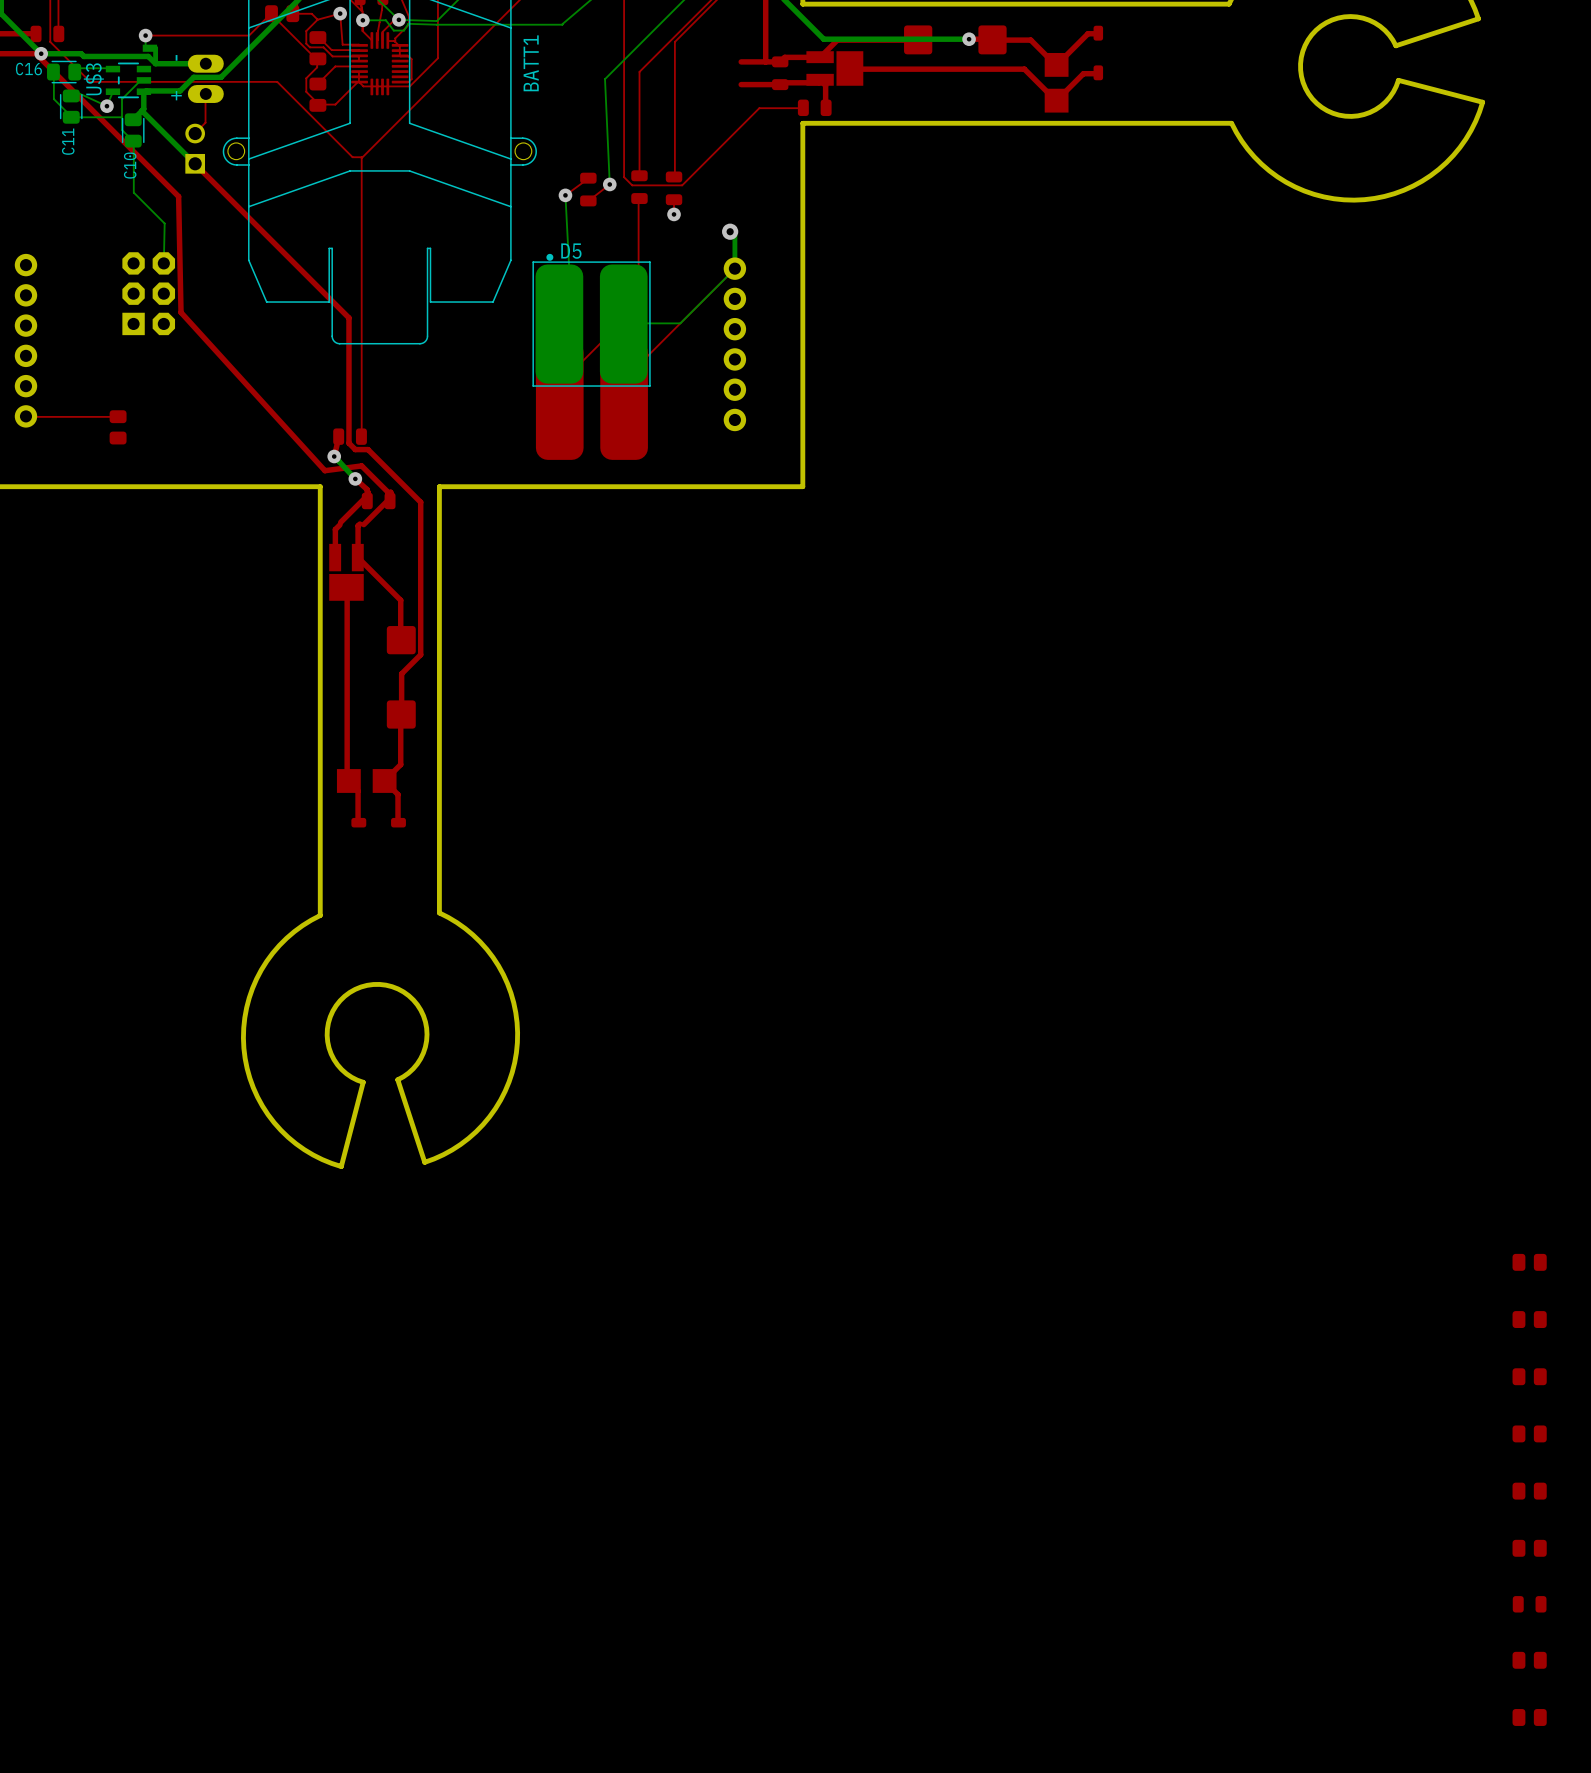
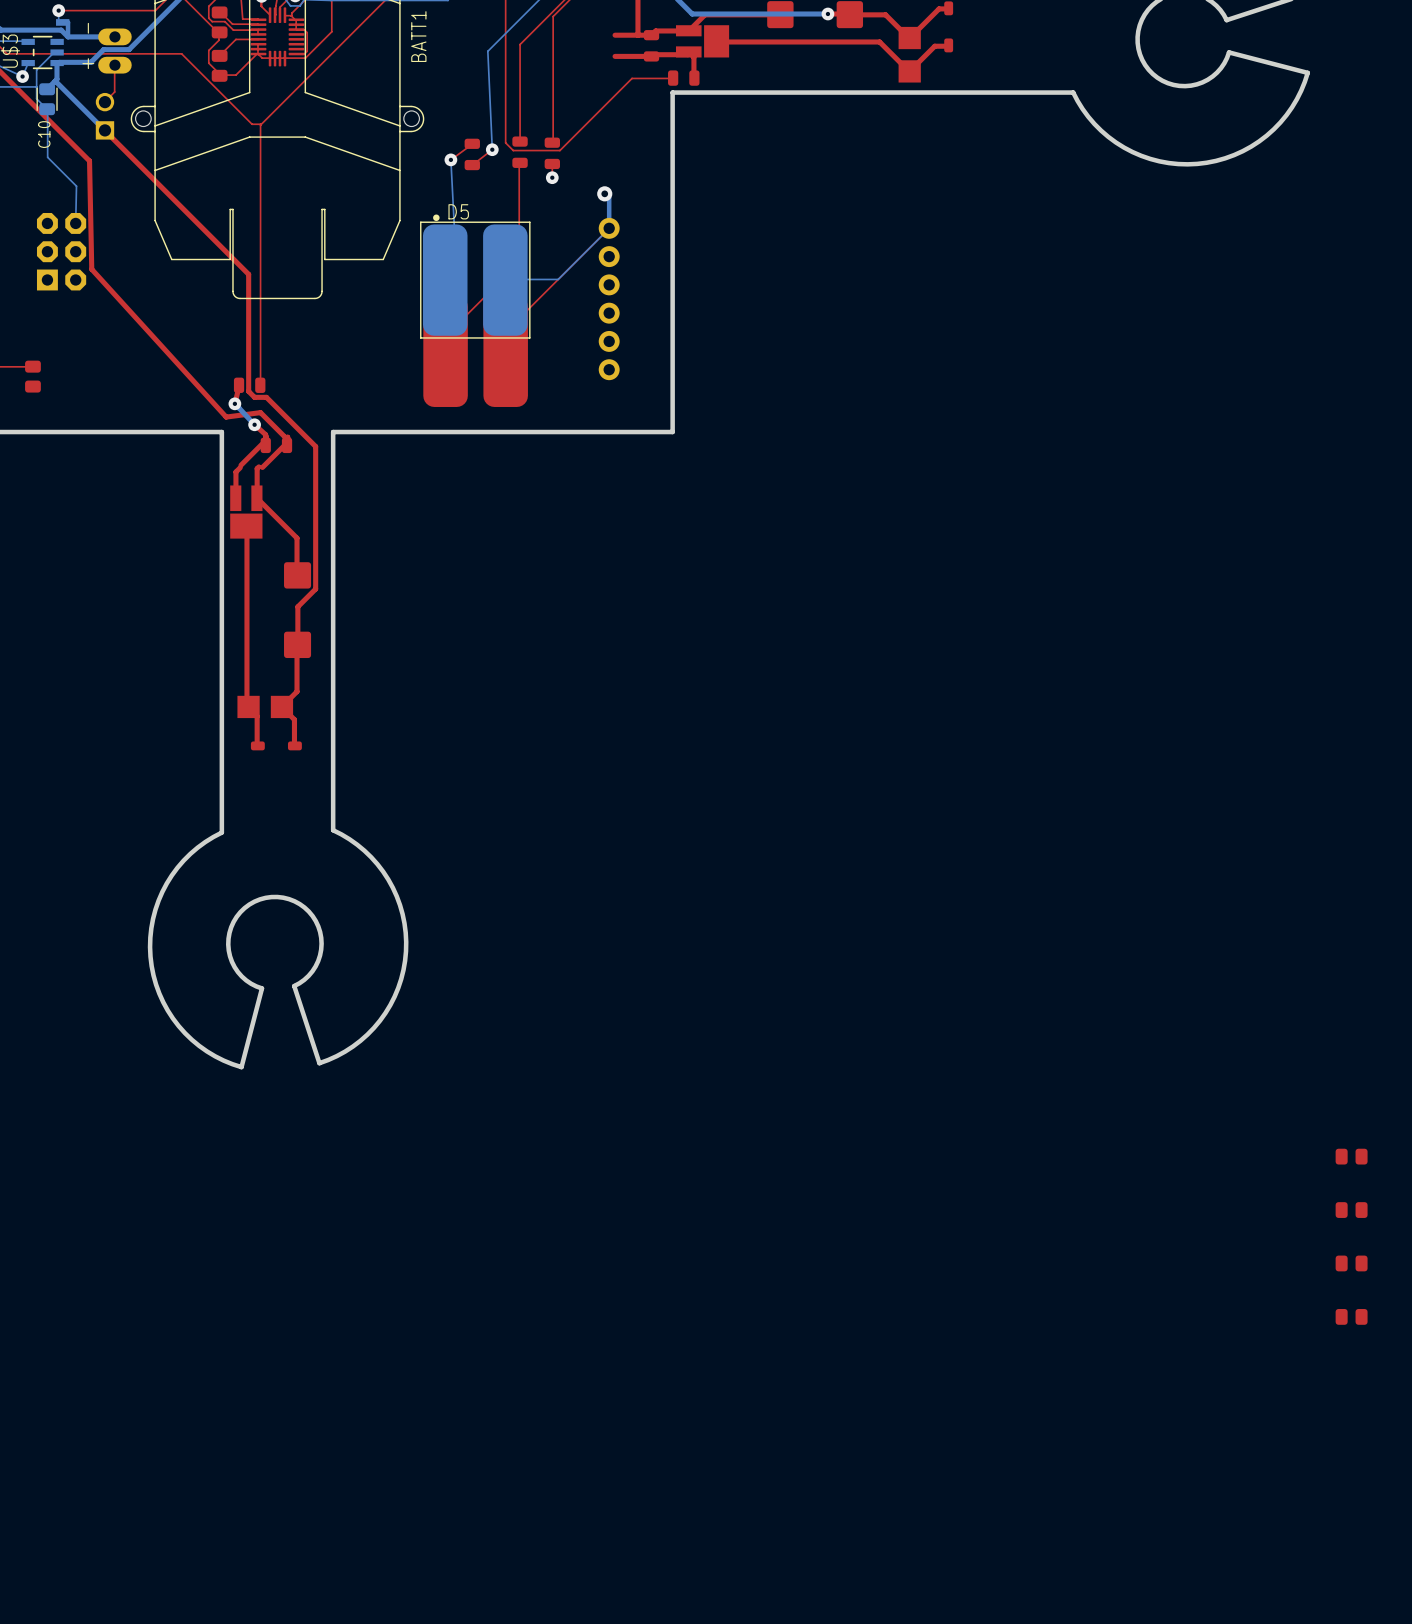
part: (1529, 1491) -> none
part: (1529, 1548) -> none
part: (1529, 1604) -> none
part: (1529, 1660) -> none
part: (1529, 1717) -> none

